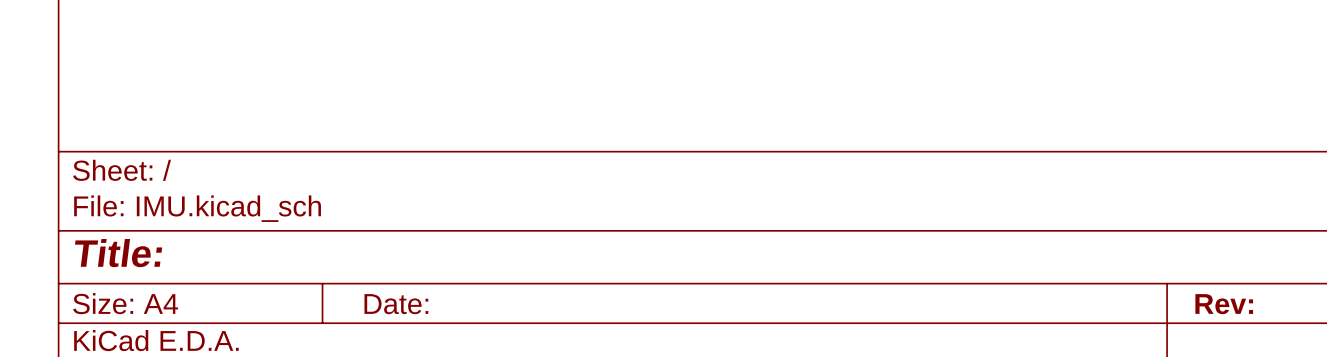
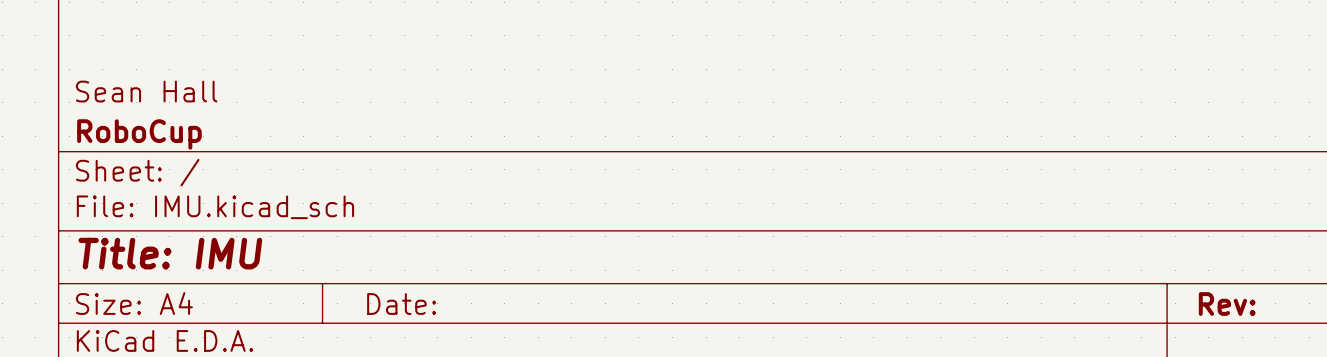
title block: none -> Sean Hall (146, 91)
title block: none -> RoboCup (139, 134)
title block: Title: (118, 253) -> Title: IMU (170, 253)

